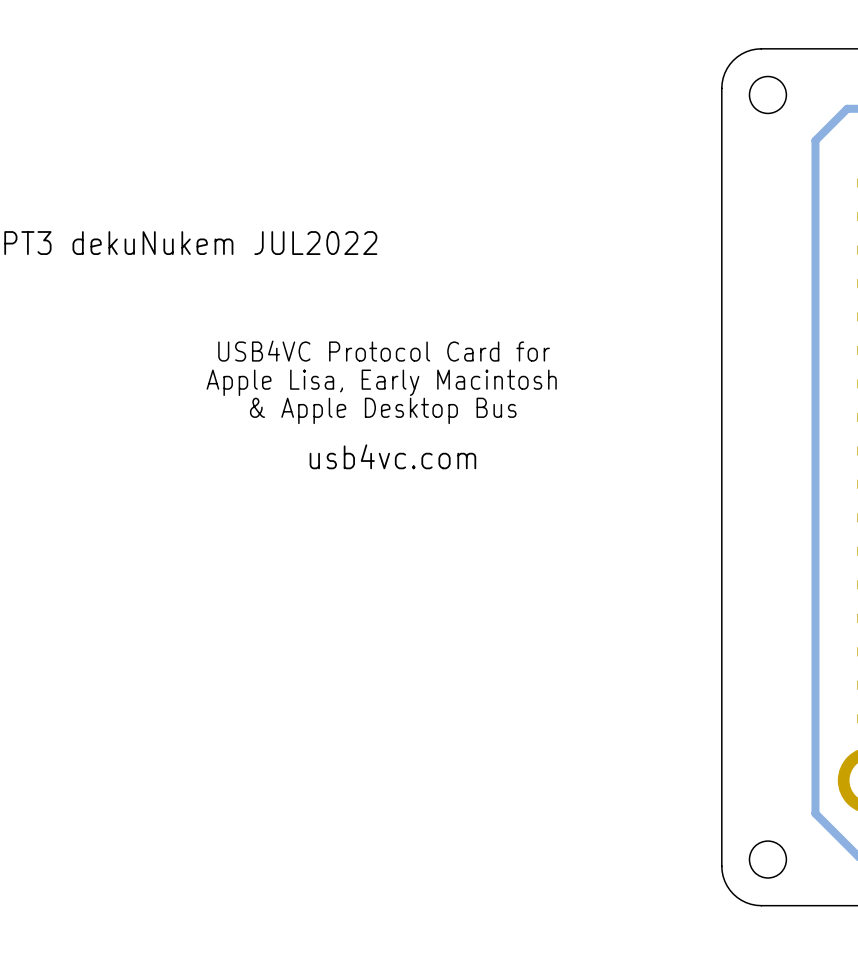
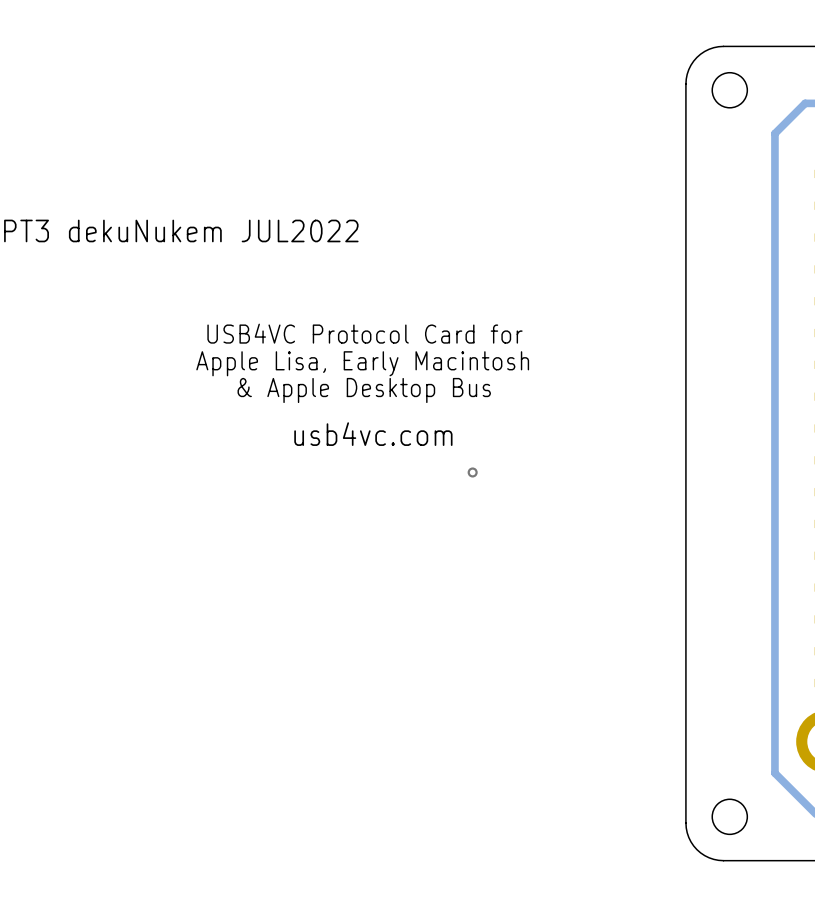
via: none -> (472, 472)

